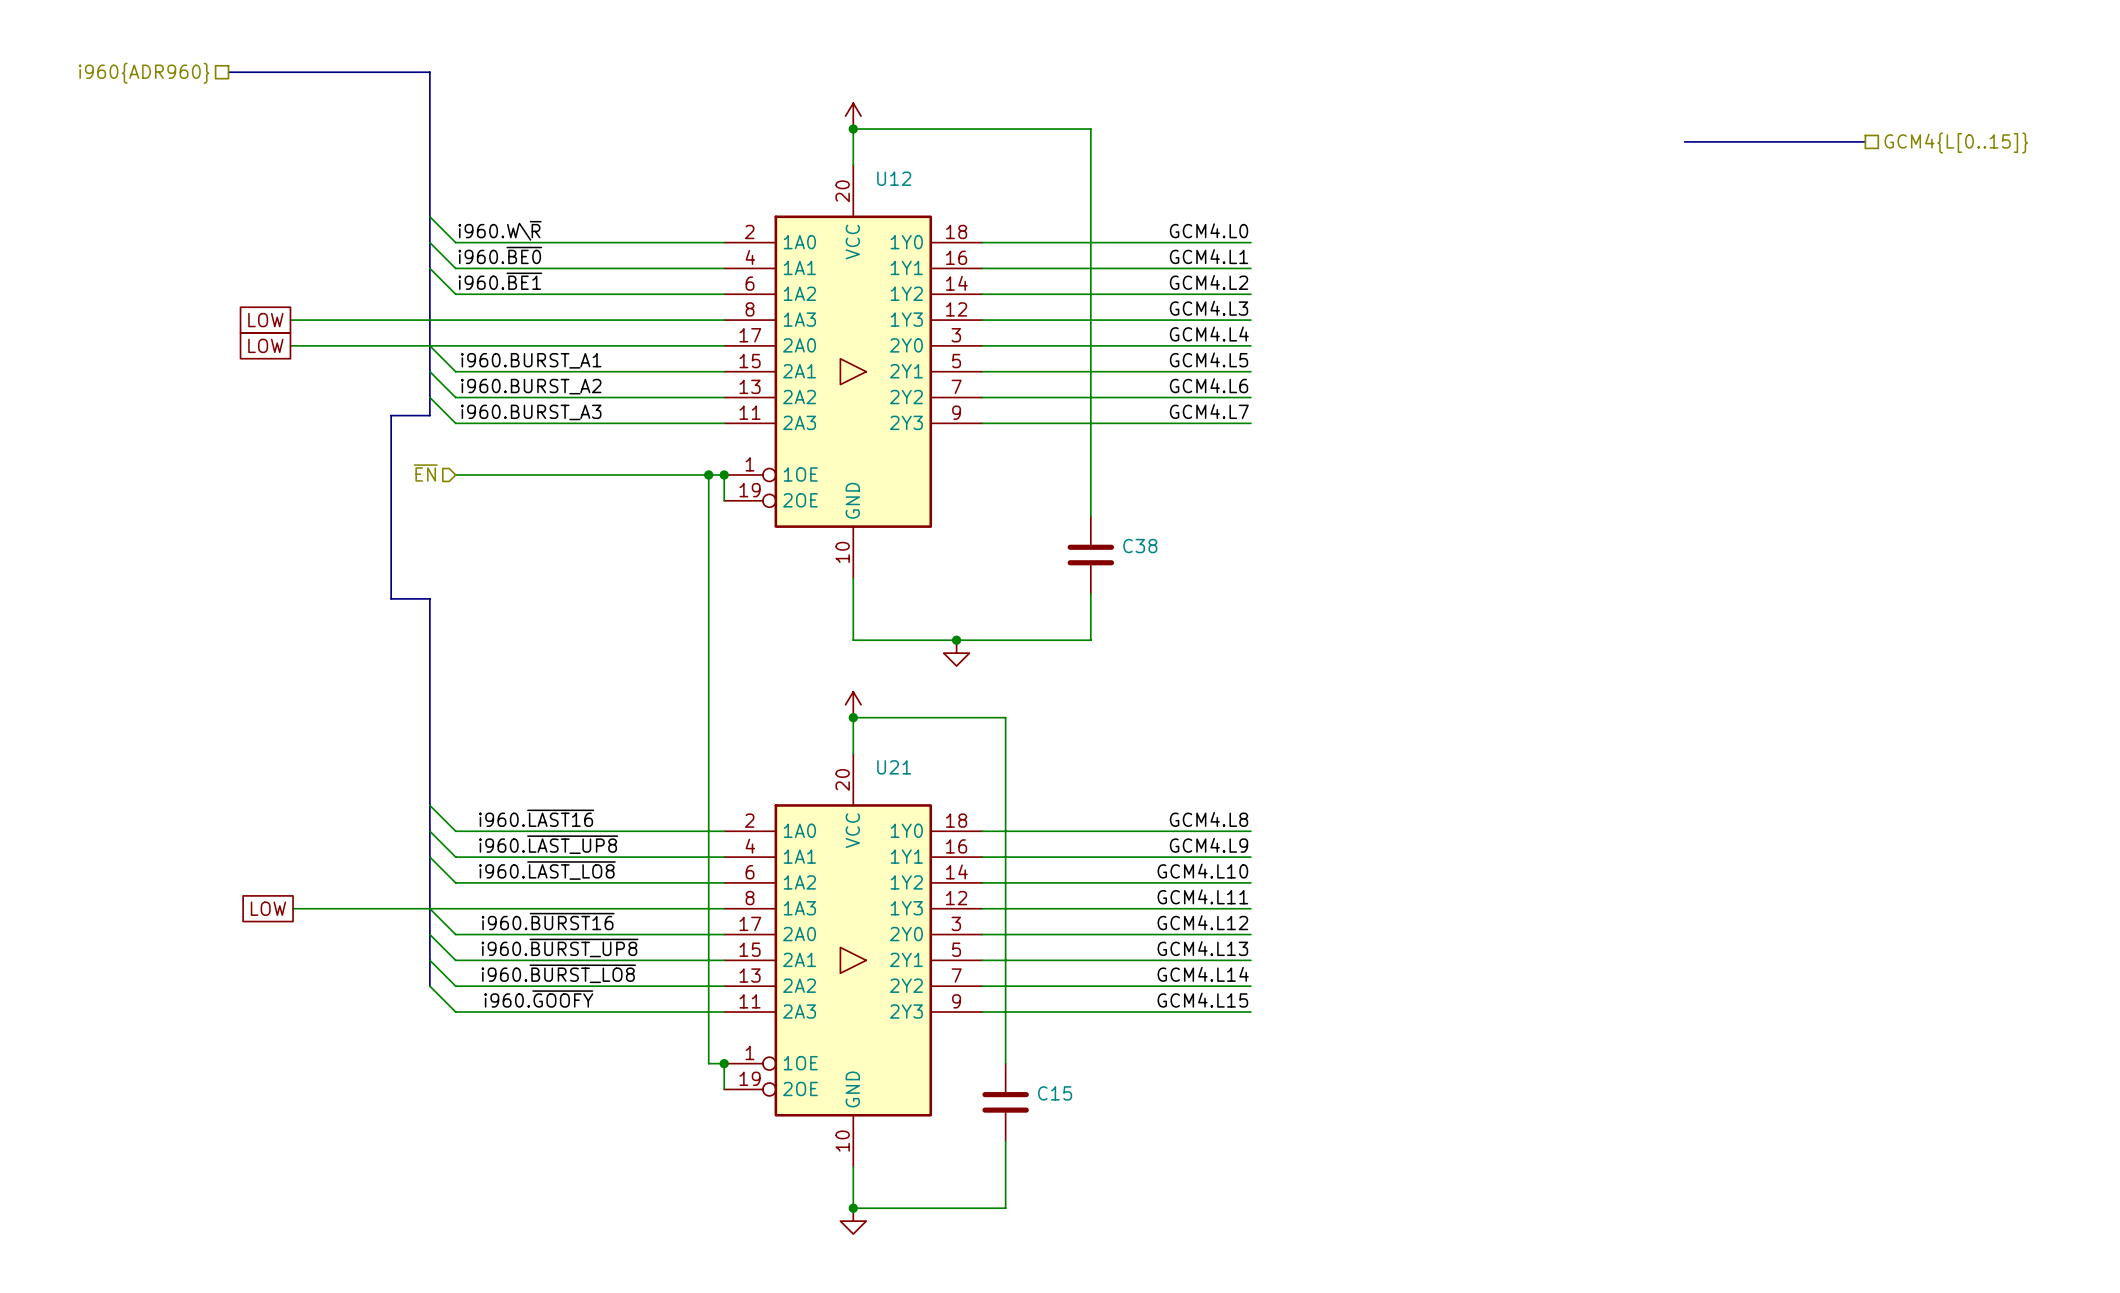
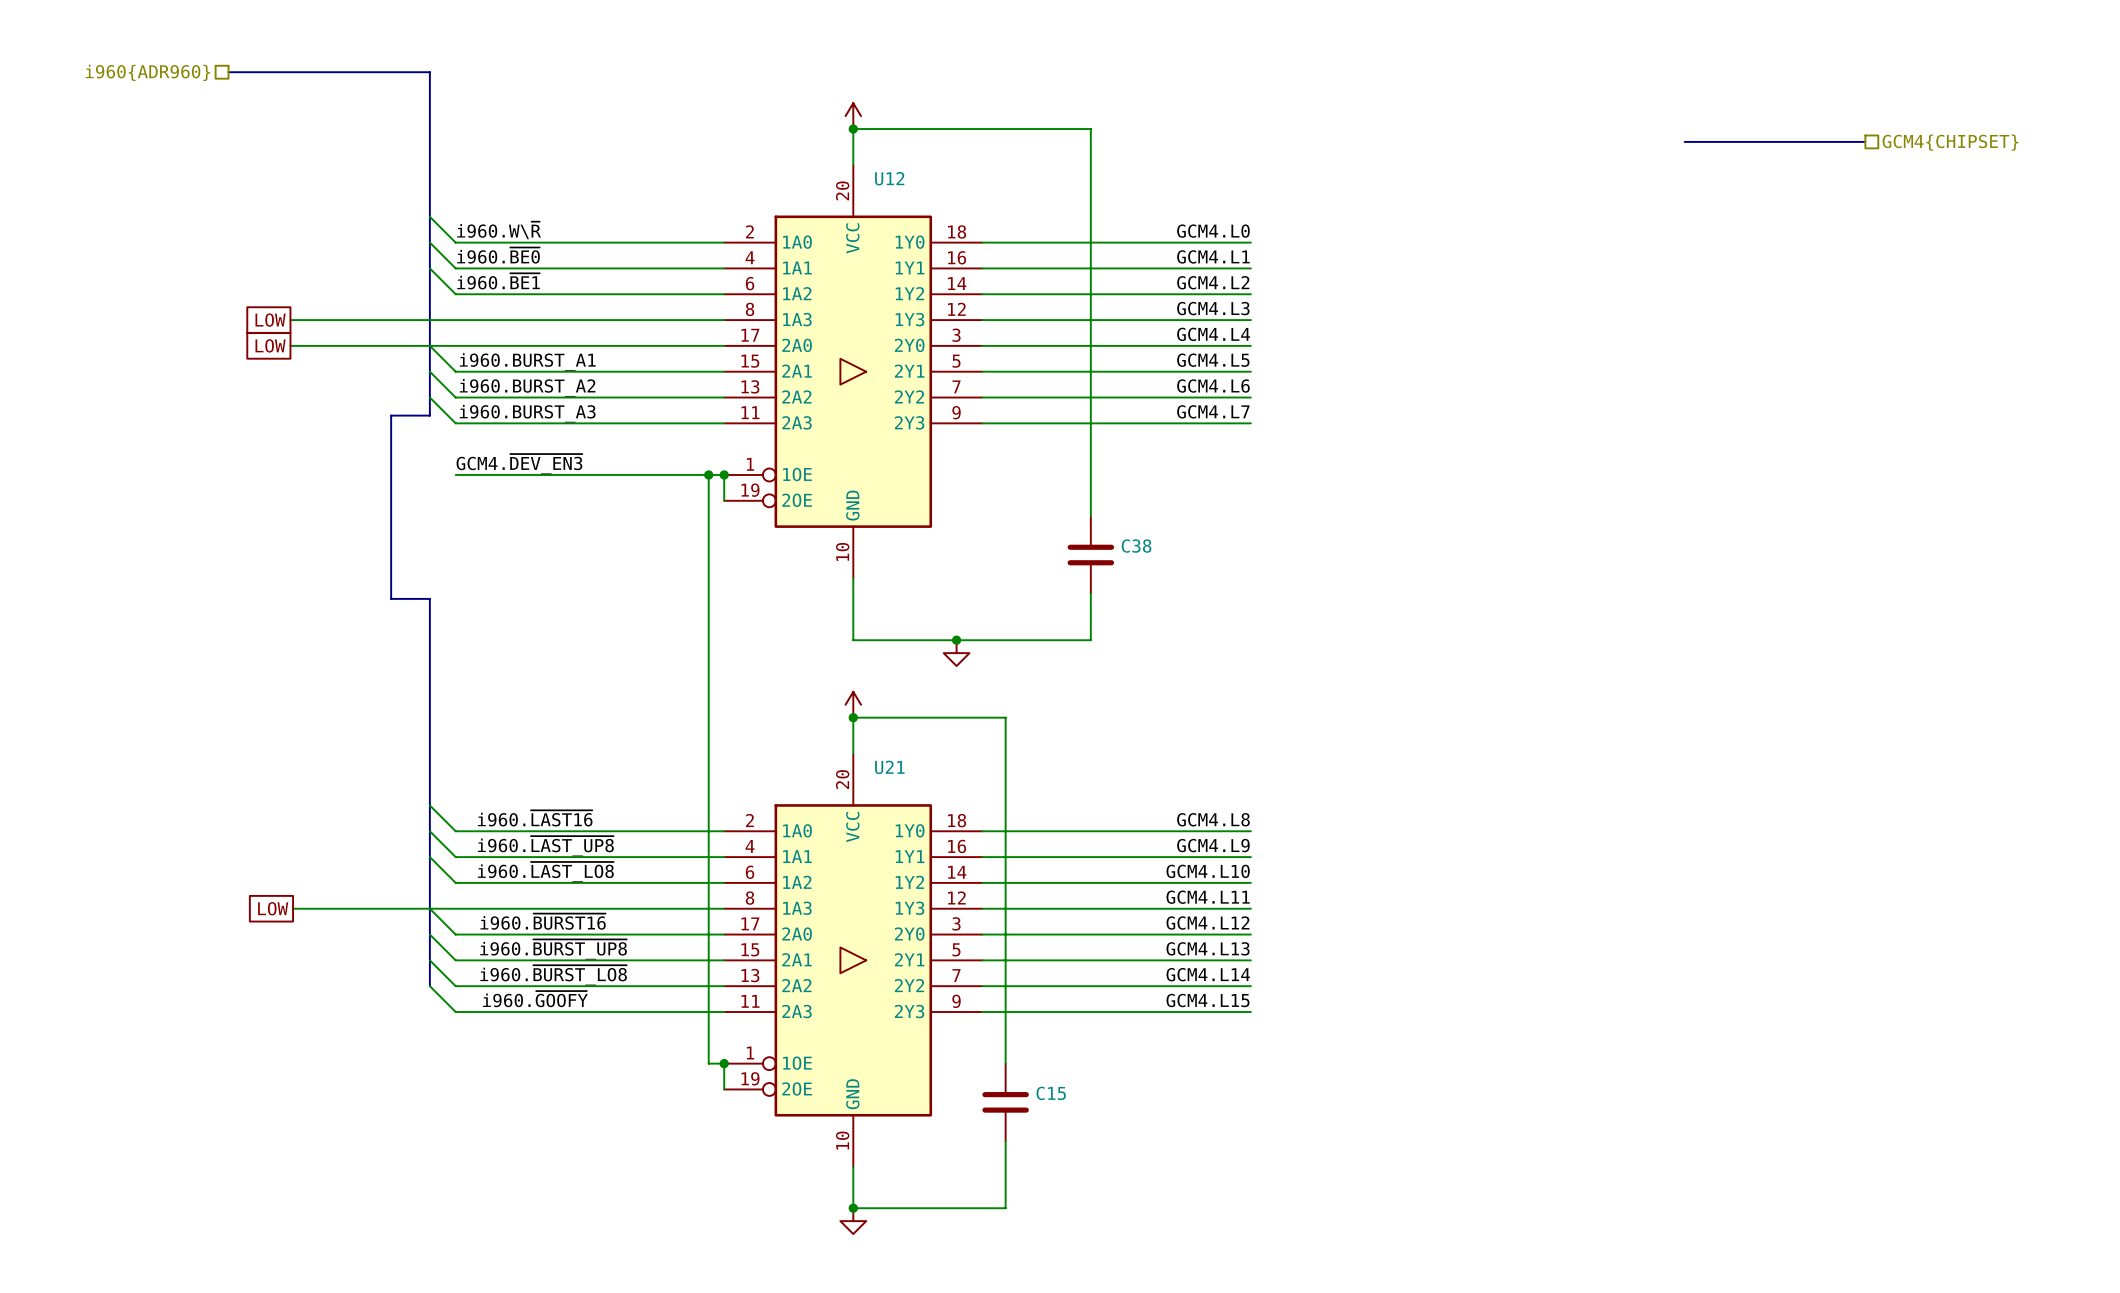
hierarchical label: GCM4{L[0..15]} (1956, 142) -> GCM4{CHIPSET} (1950, 142)
label: none -> GCM4.~{DEV_EN3} (519, 464)
hierarchical label: ~{EN} (425, 473) -> none

